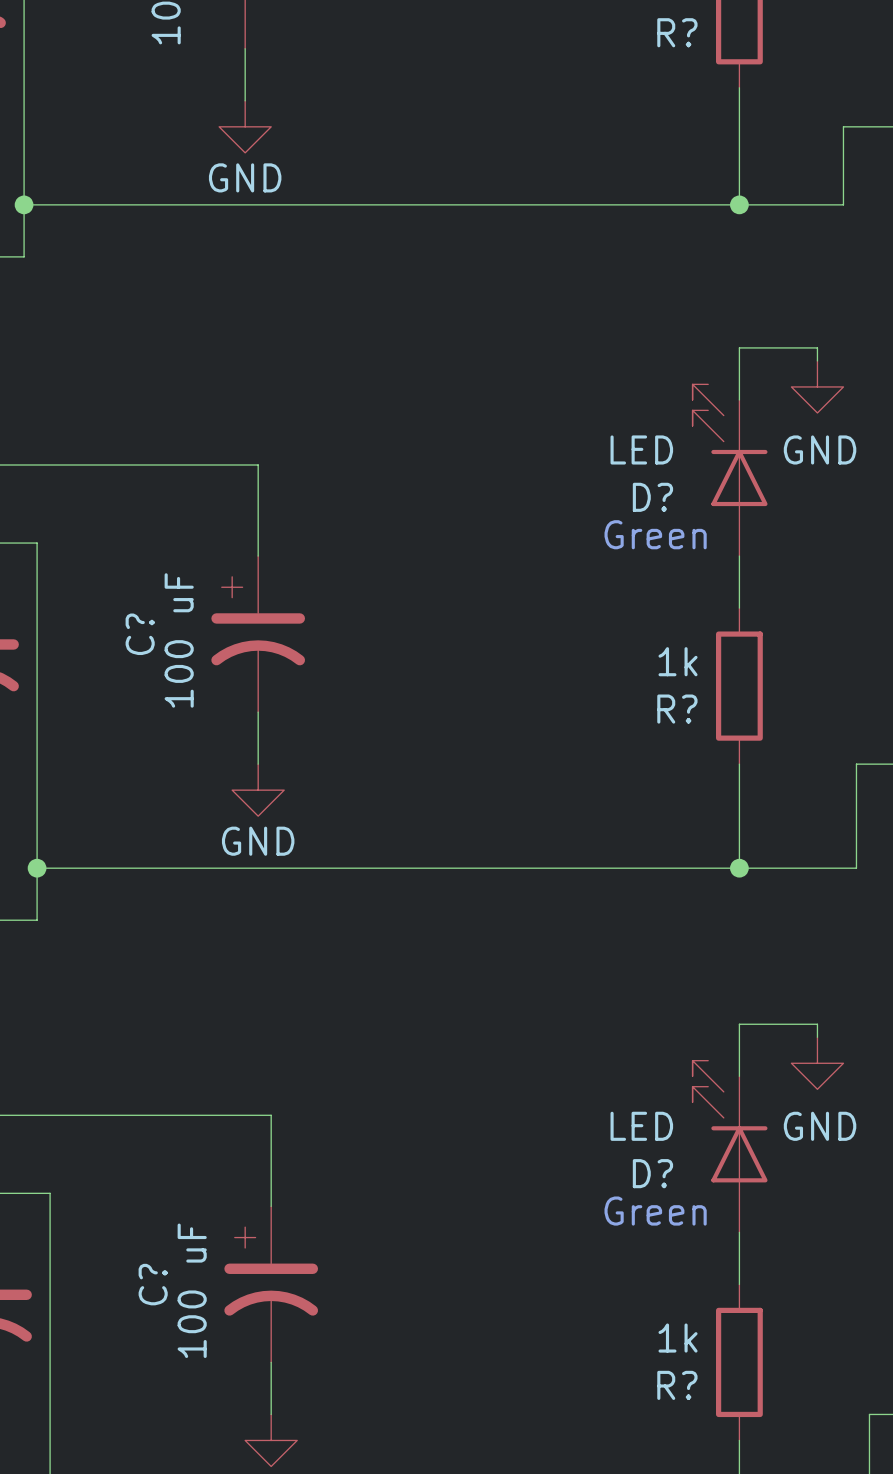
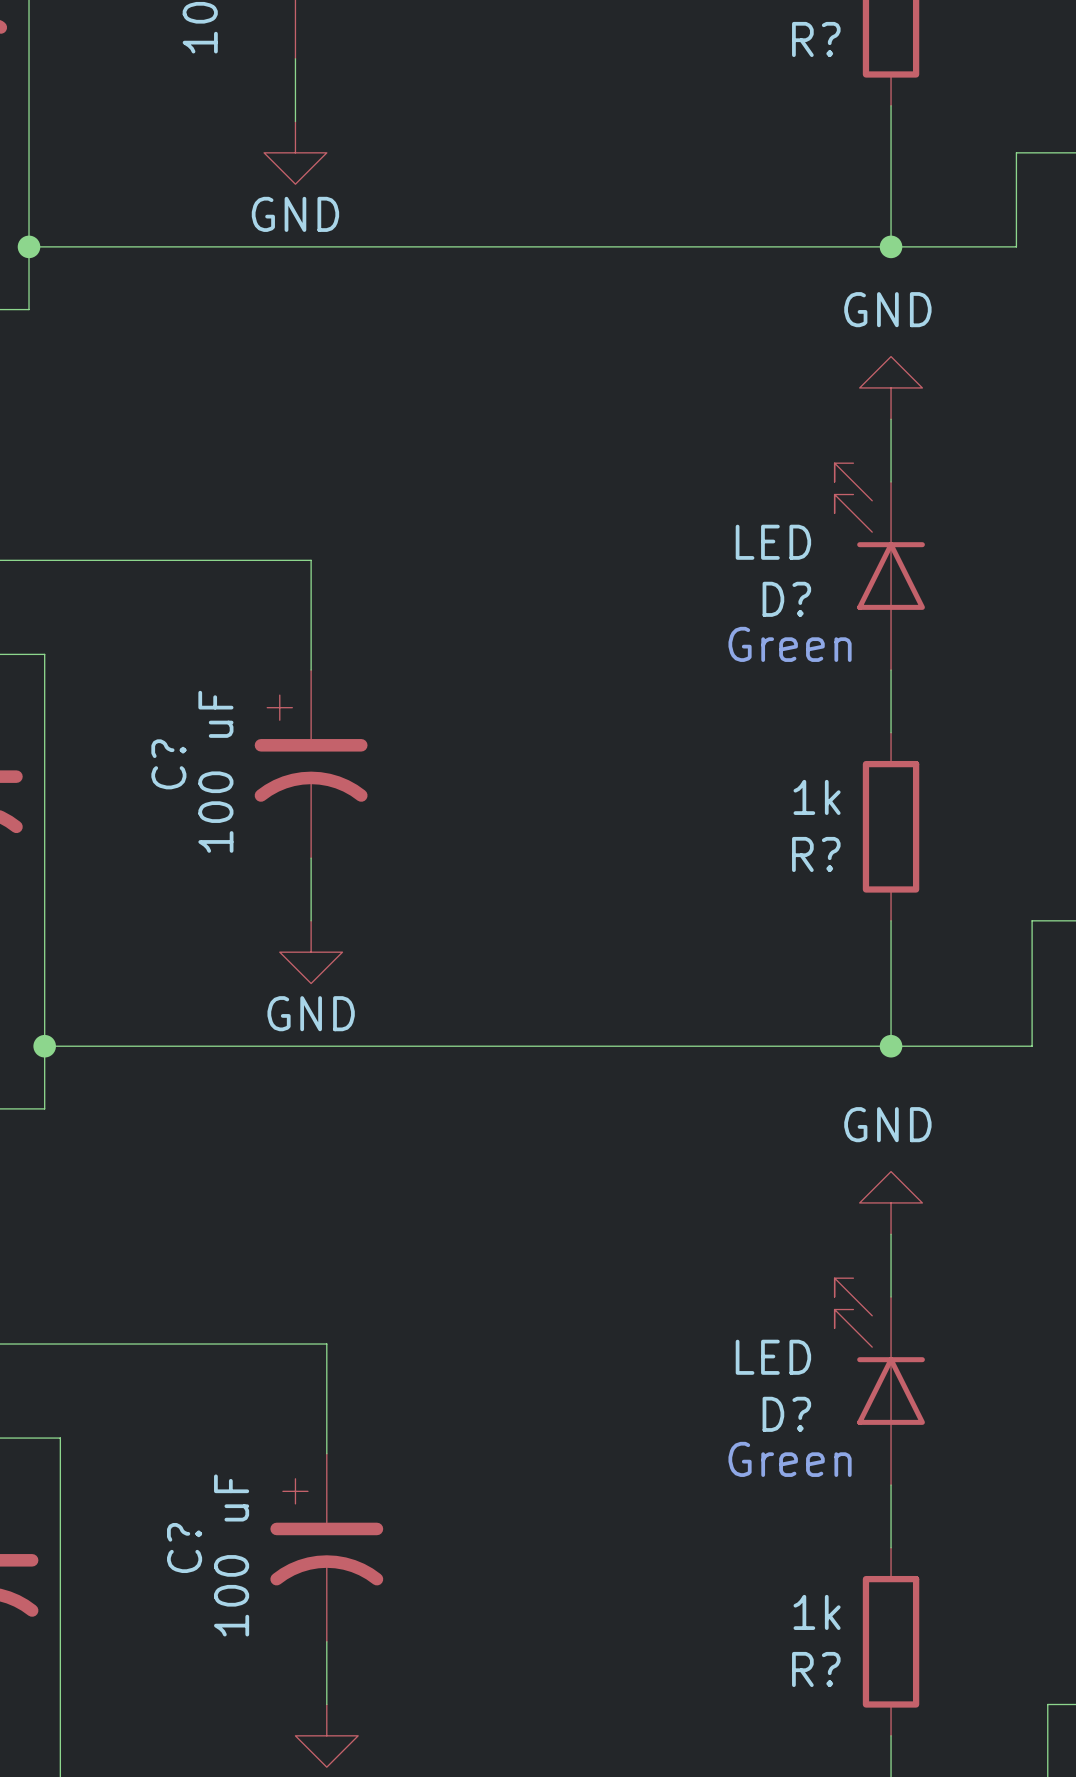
wire: (739, 347) (817, 347) (817, 360) -> none
power symbol rotation: 0° (817, 386) -> 180° (891, 387)
power symbol position: GND (817, 386) -> GND (891, 387)
wire: (739, 1024) (817, 1024) (817, 1037) -> none
power symbol rotation: 0° (817, 1063) -> 180° (891, 1202)
power symbol position: GND (817, 1063) -> GND (891, 1202)

